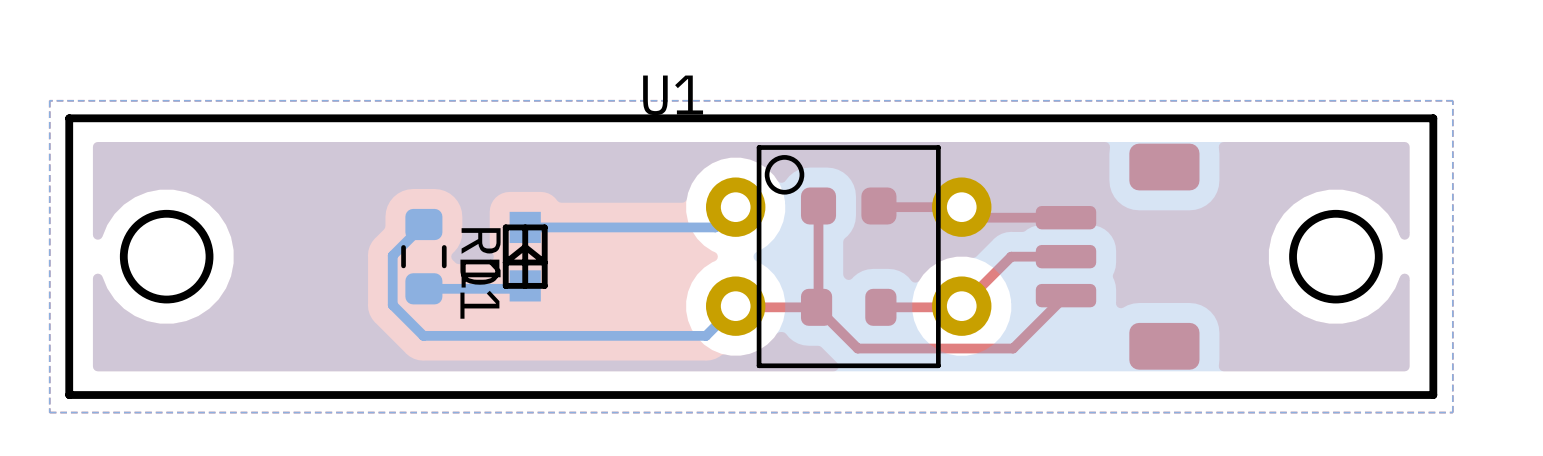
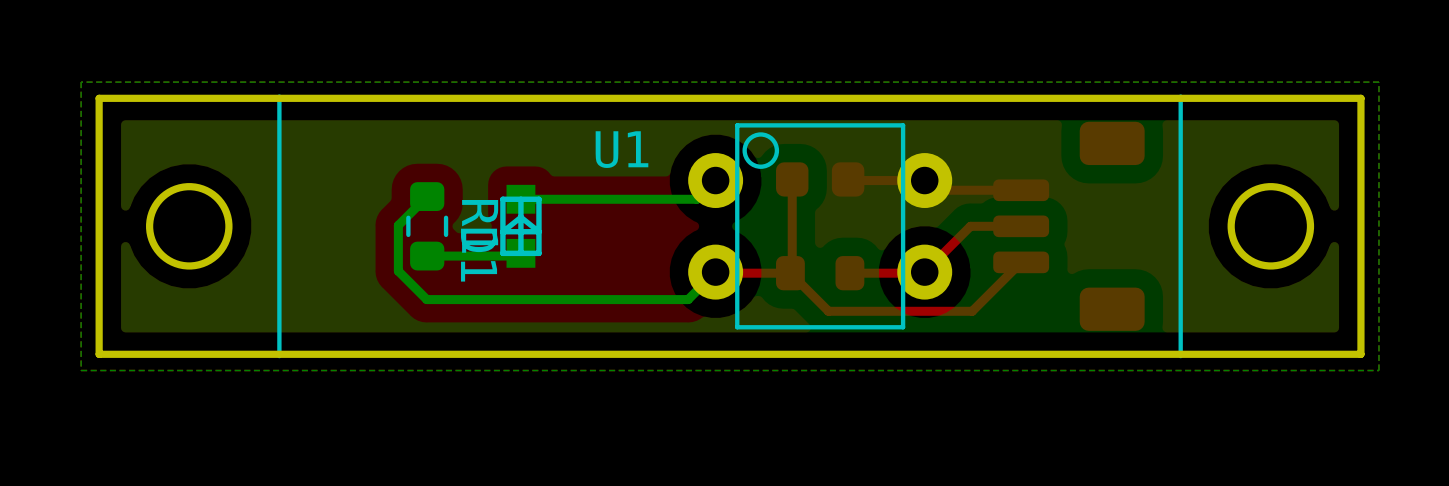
U1 name position: U1 (673, 95) -> U1 (621, 149)
line: none -> (279, 96) (279, 356)
line: none -> (1180, 96) (1180, 356)

